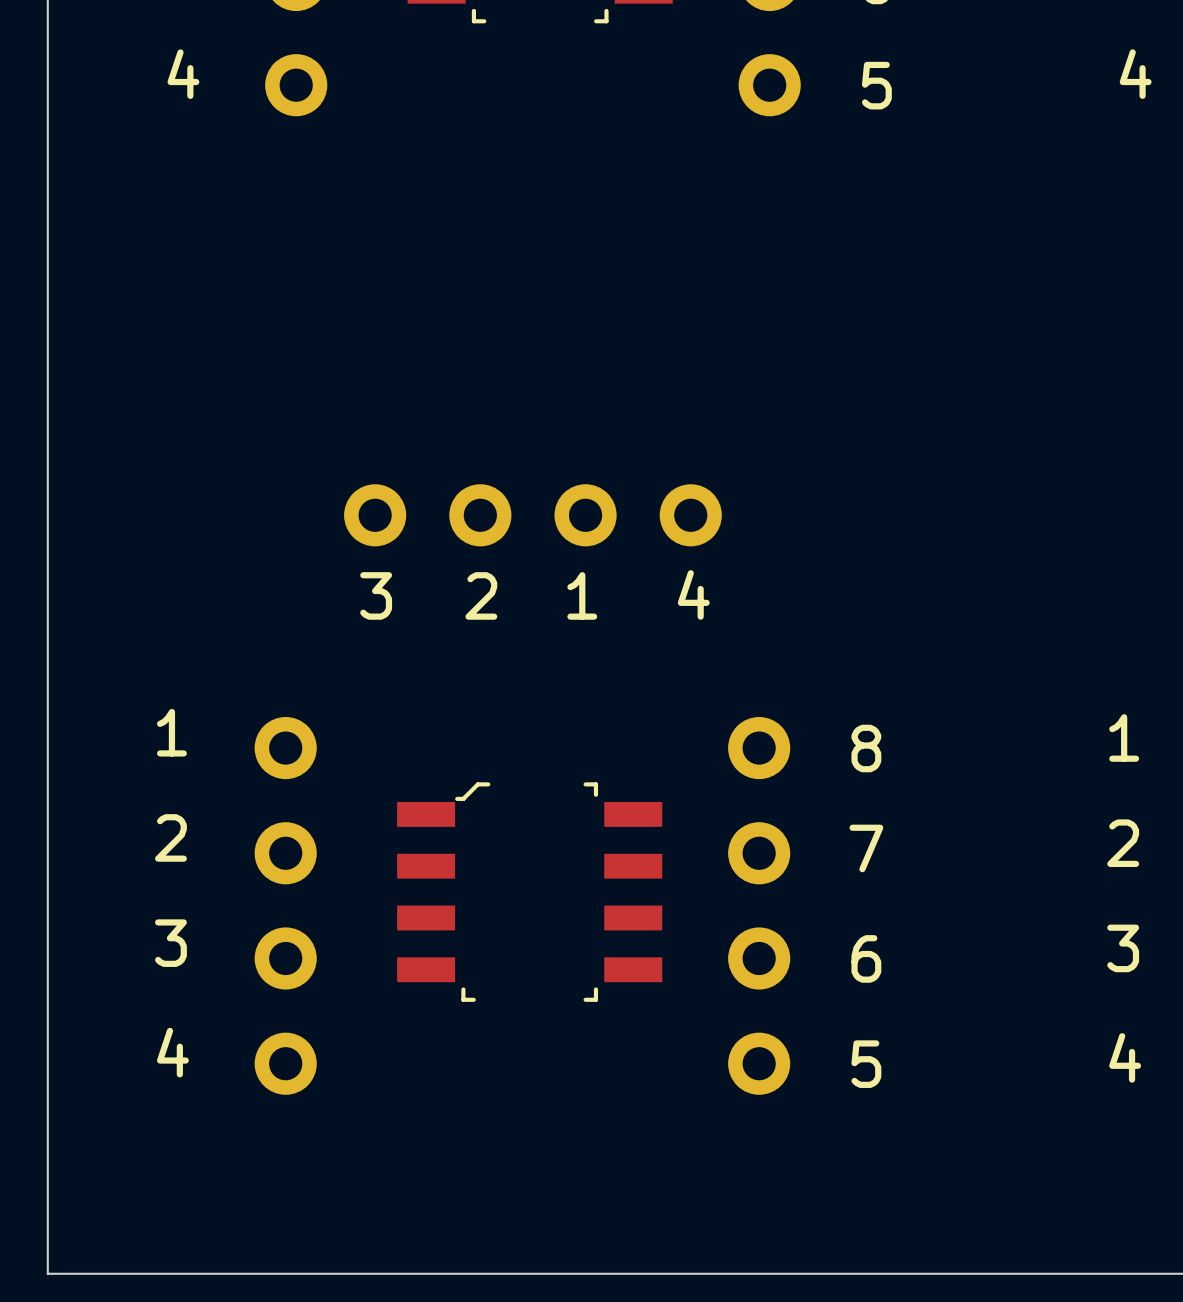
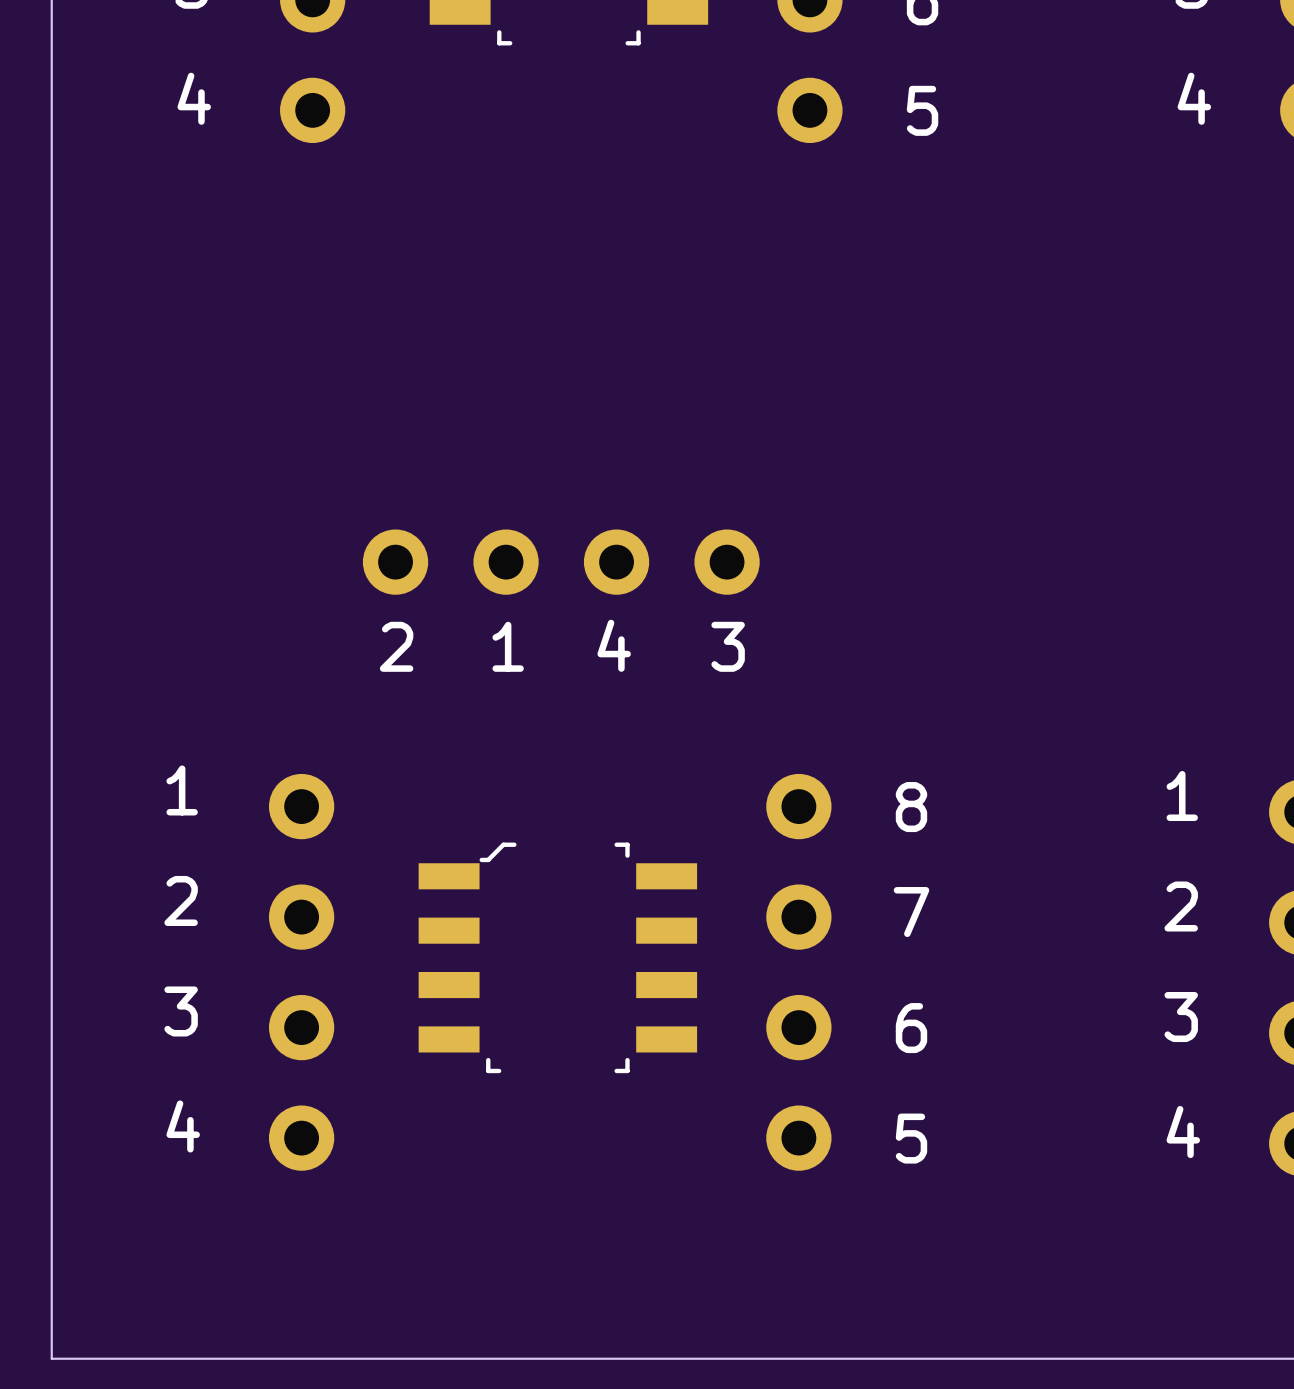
text: 4 (693, 594) -> 3 (728, 646)
text: 3 (376, 595) -> 2 (396, 646)
text: 2 (481, 595) -> 1 (508, 646)
text: 1 (582, 595) -> 4 (614, 645)

